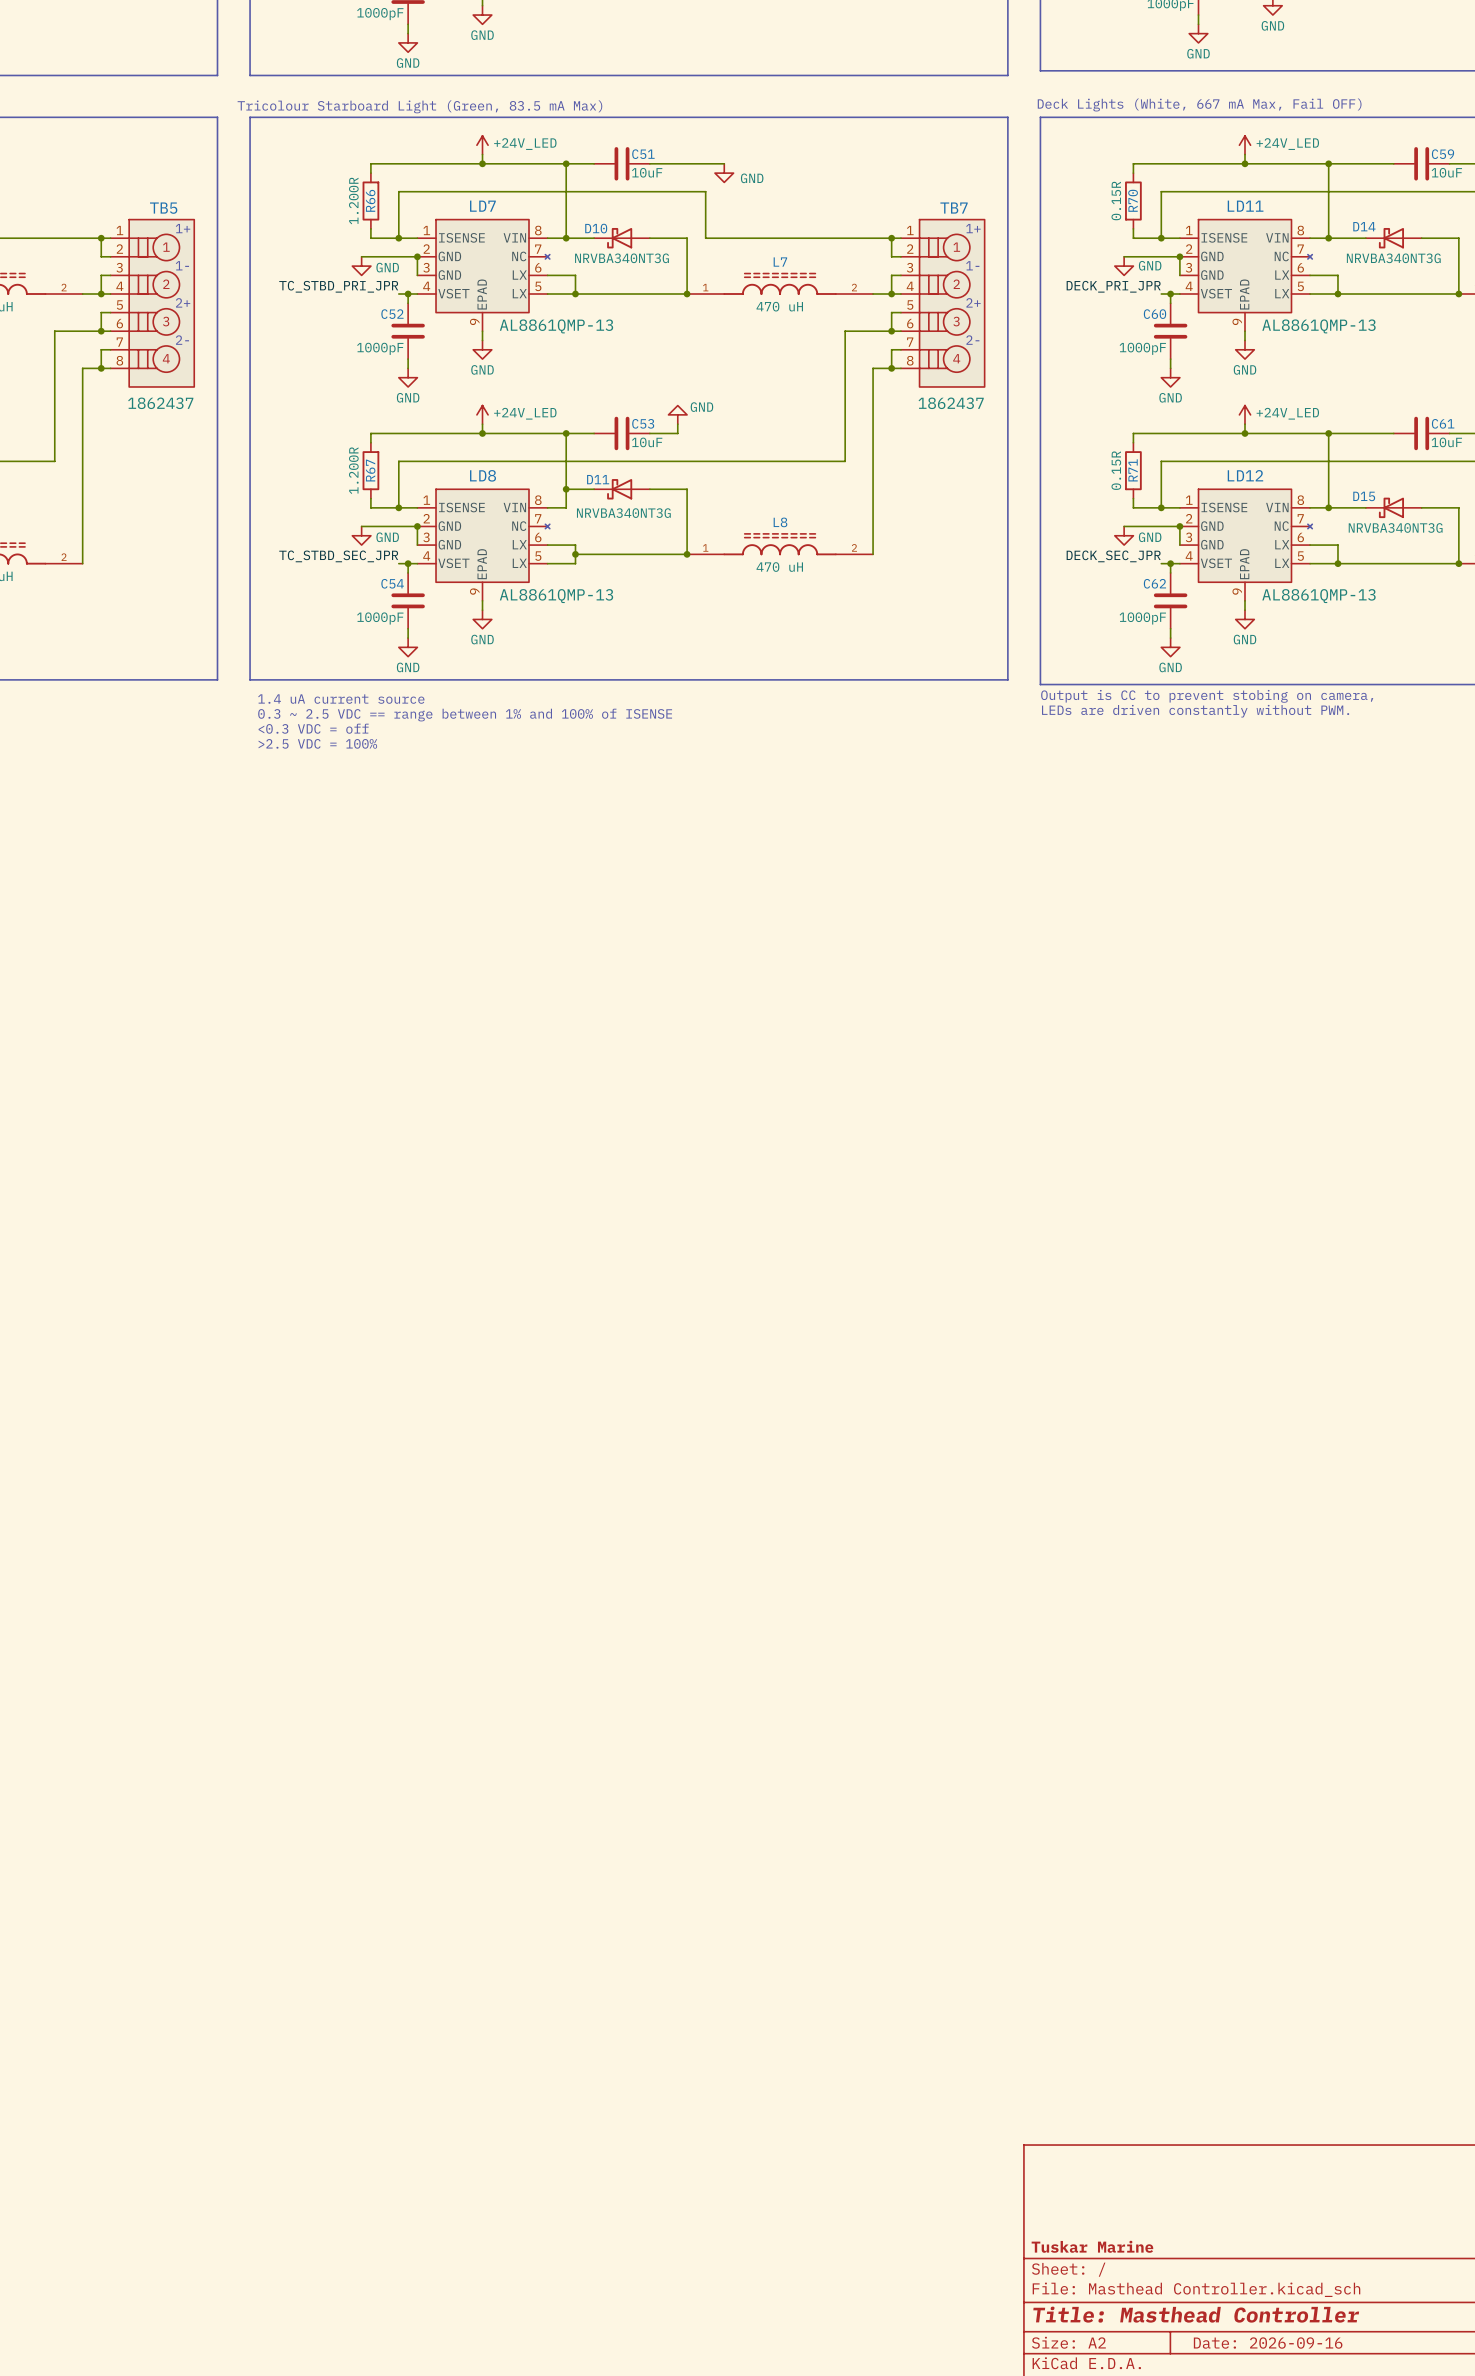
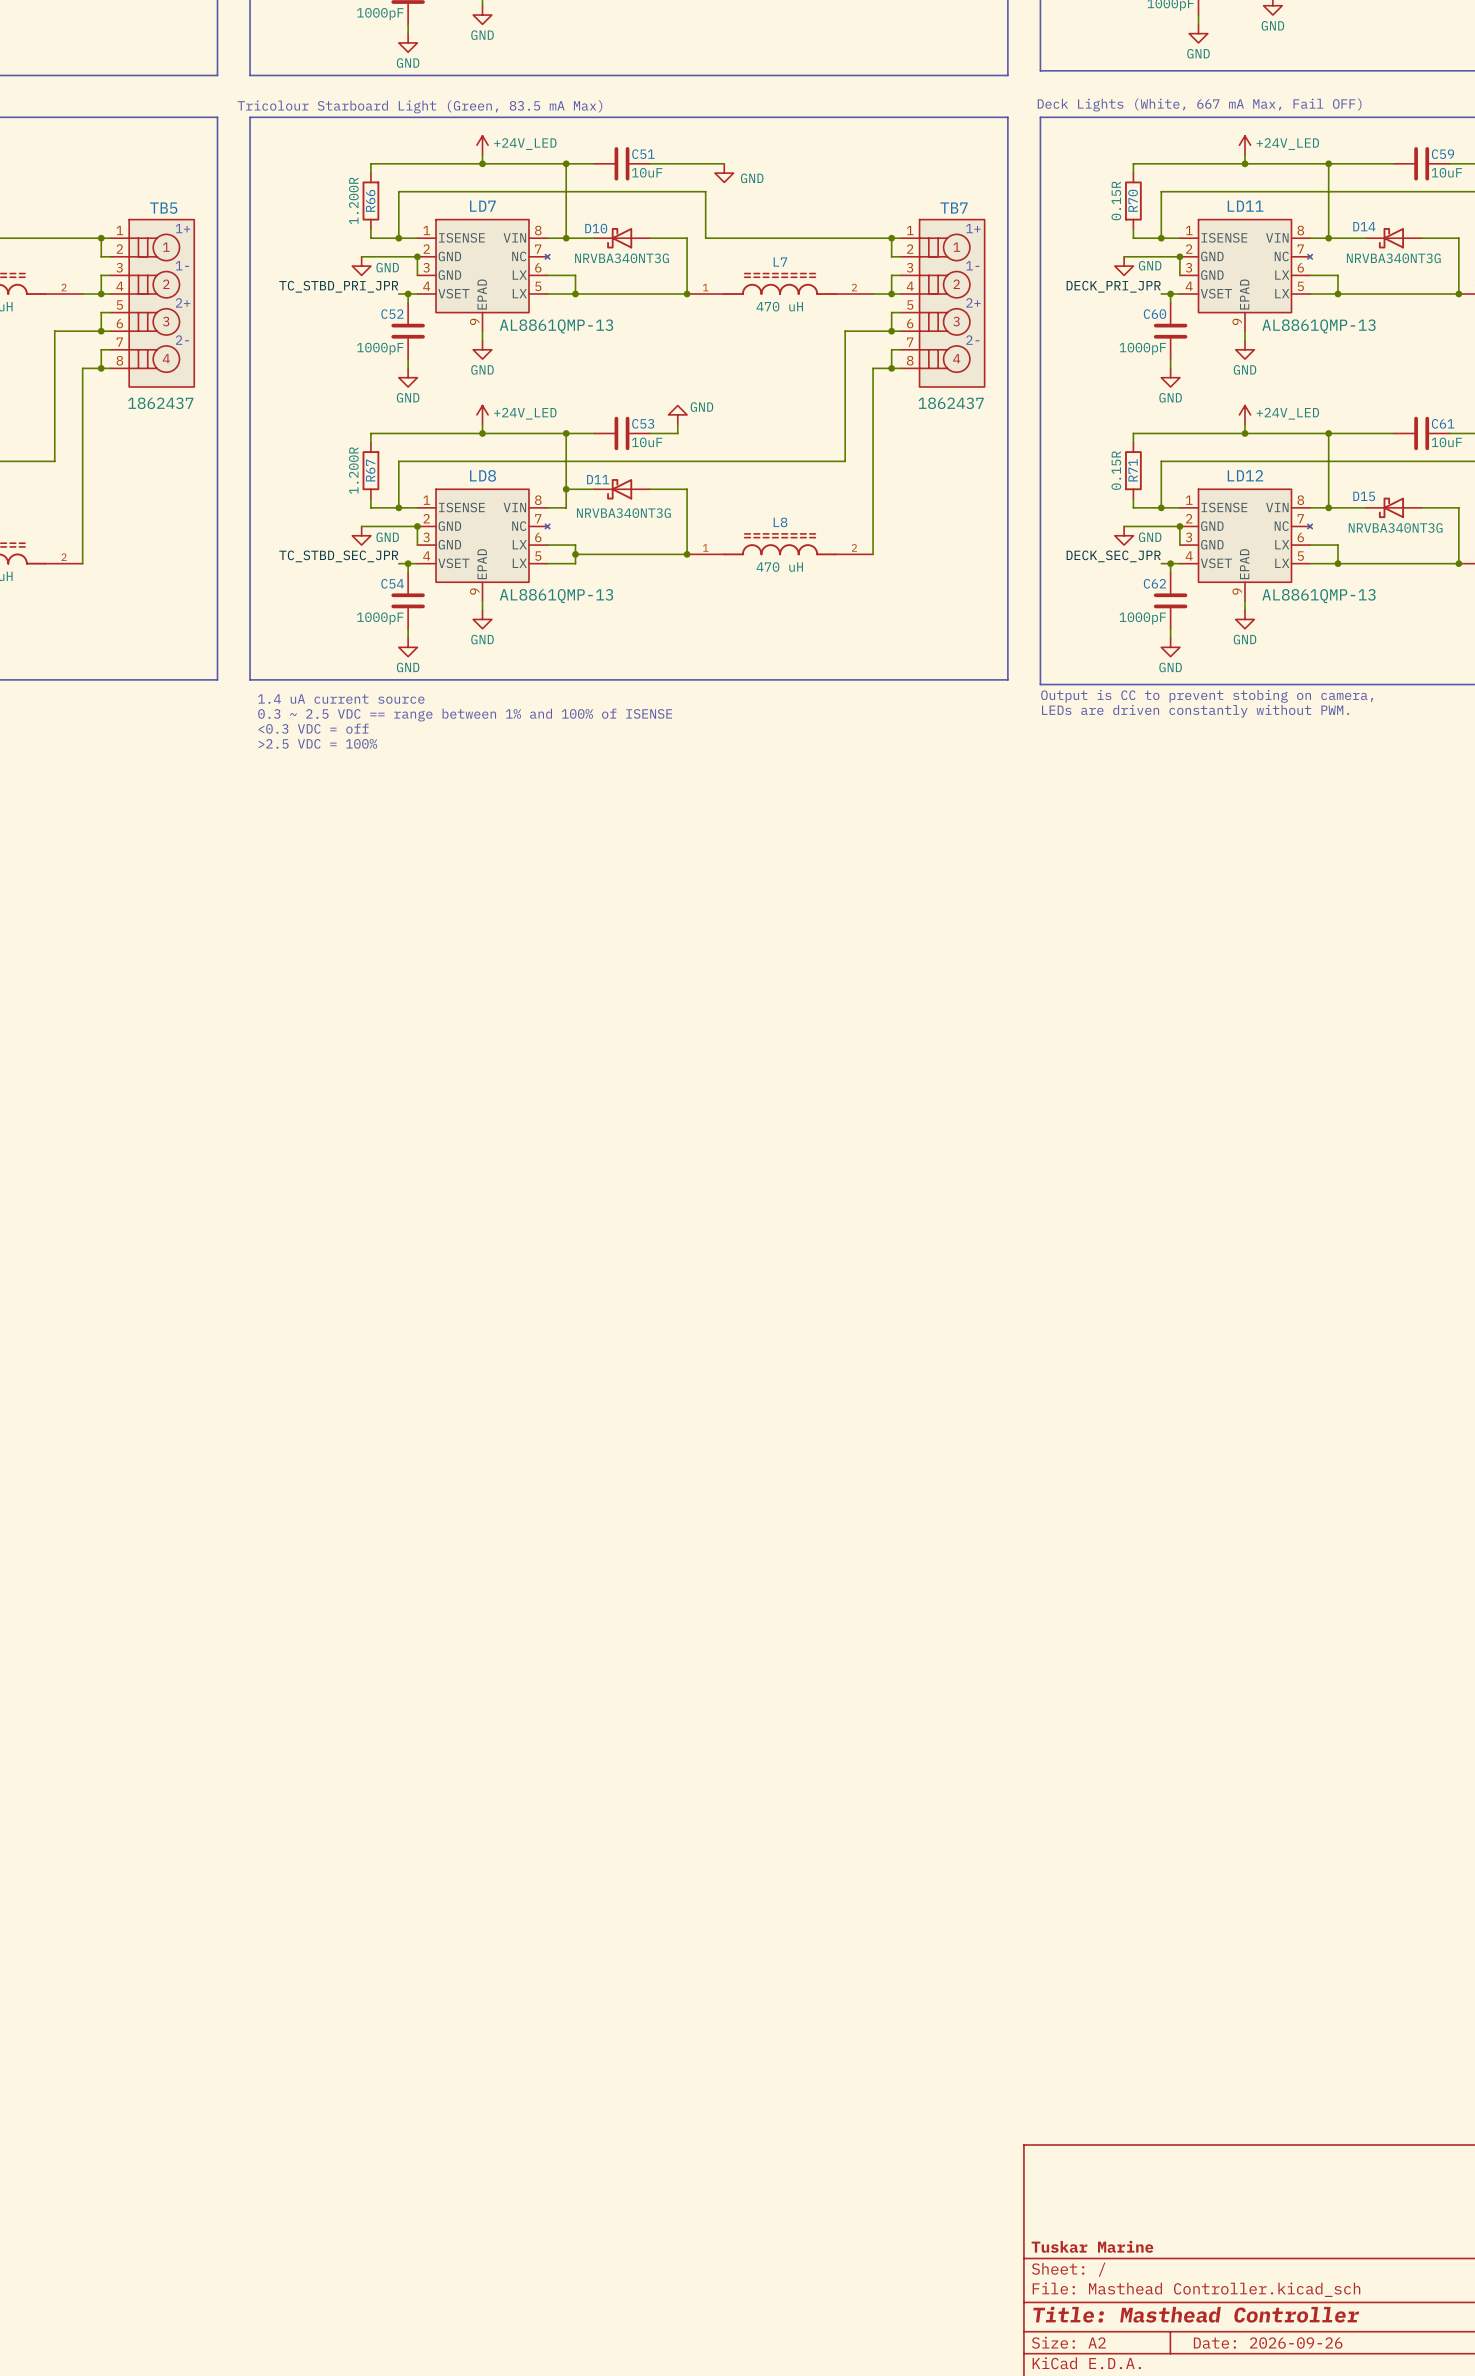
title block: Date: 2026-09-16 (1268, 2343) -> Date: 2026-09-26 (1268, 2343)

